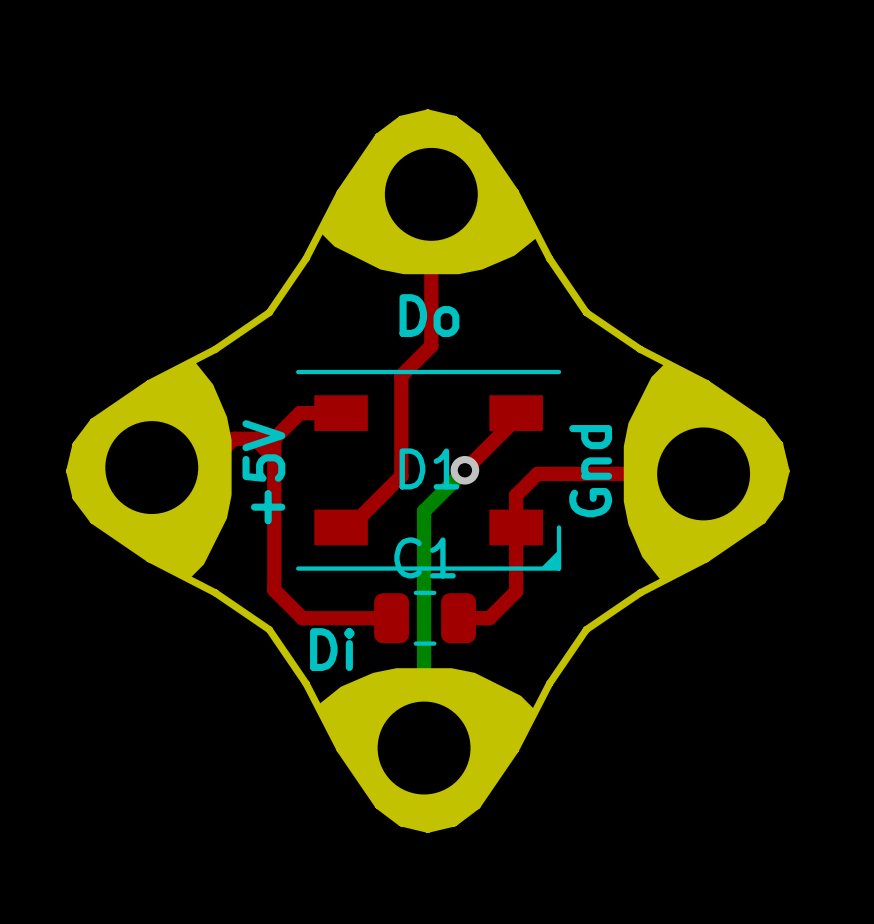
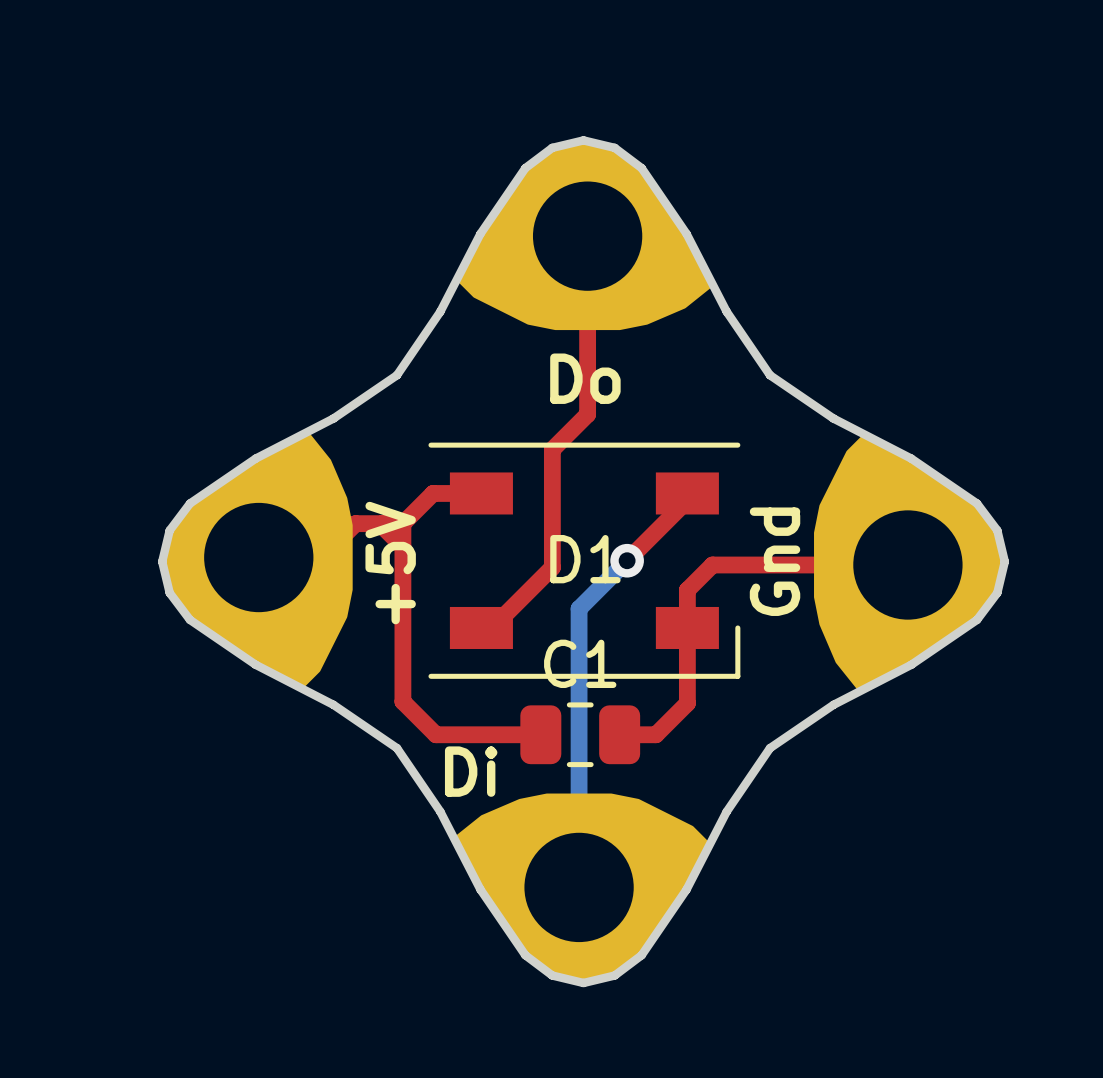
D1 footprint: [296, 369, 562, 571] -> [428, 442, 741, 679]

